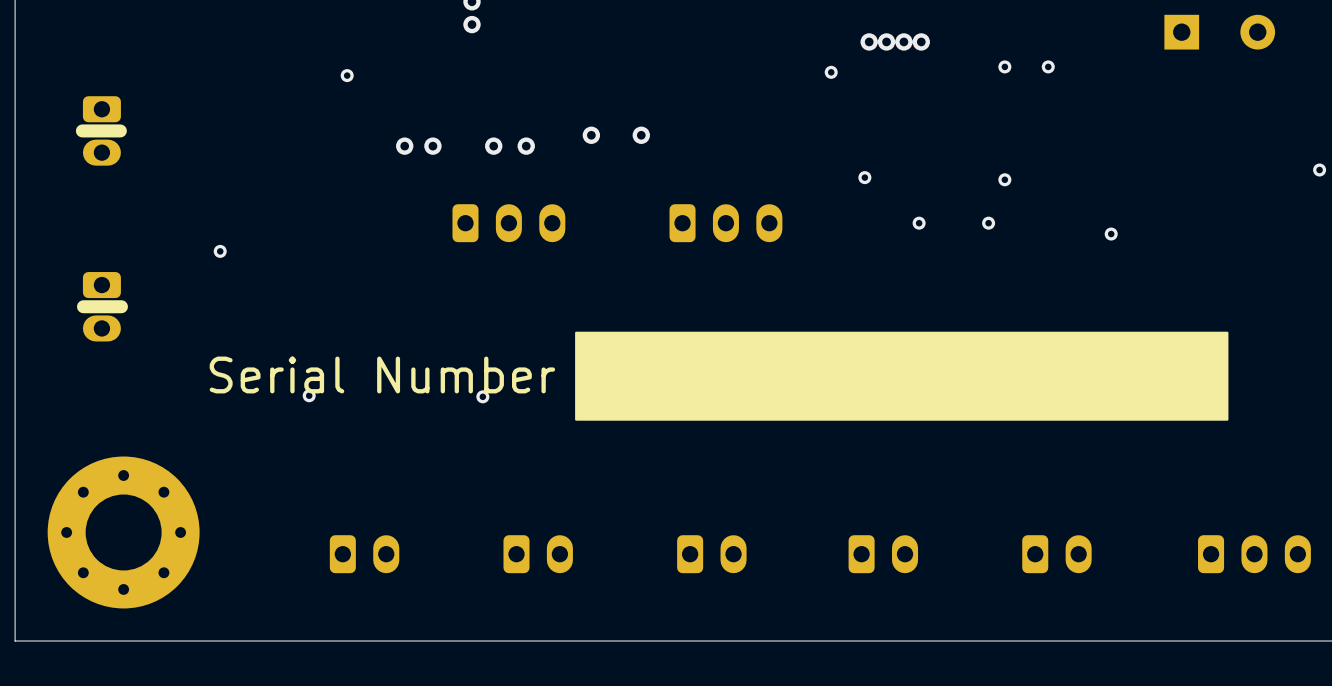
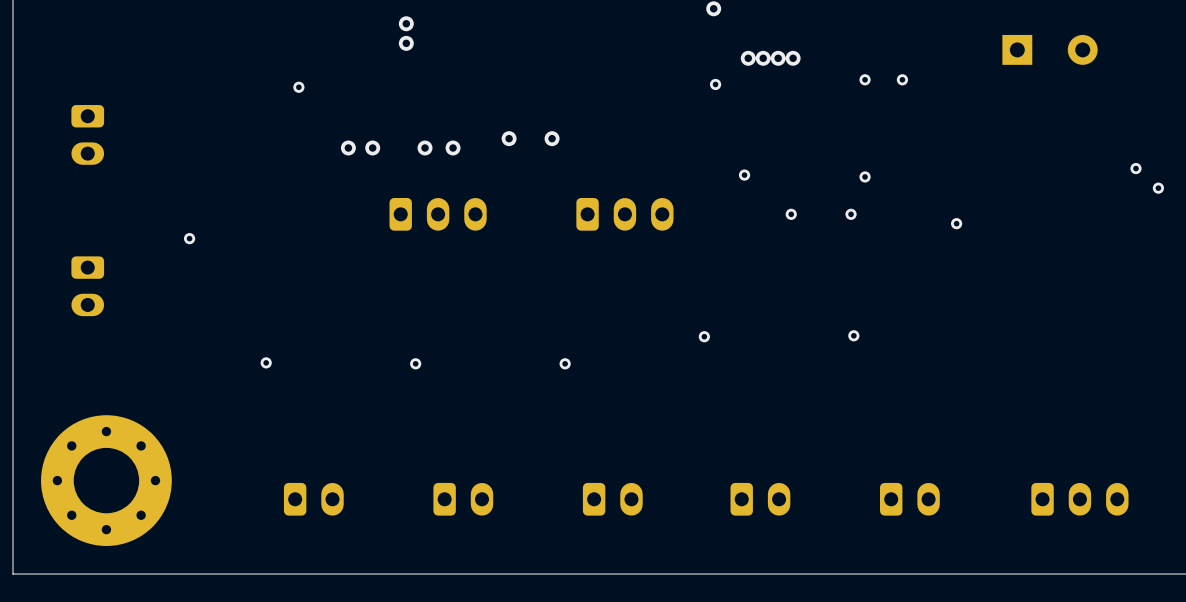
line: (120, 130) (82, 130) -> none
line: (121, 306) (83, 306) -> none
drawing: [575, 331, 1229, 421] -> none
text: Serial Number (382, 374) -> none

